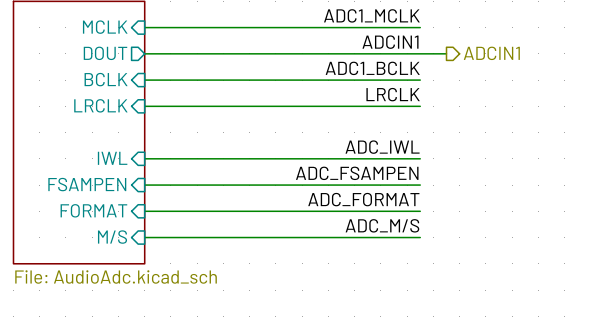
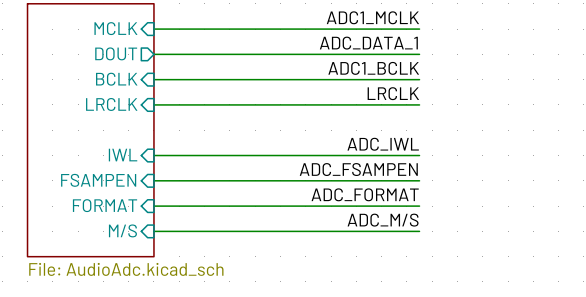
label: ADCIN1 (390, 42) -> ADC_DATA_1 (368, 43)
wire: (420, 53) (446, 53) -> none
hierarchical label: ADCIN1 (491, 53) -> none

